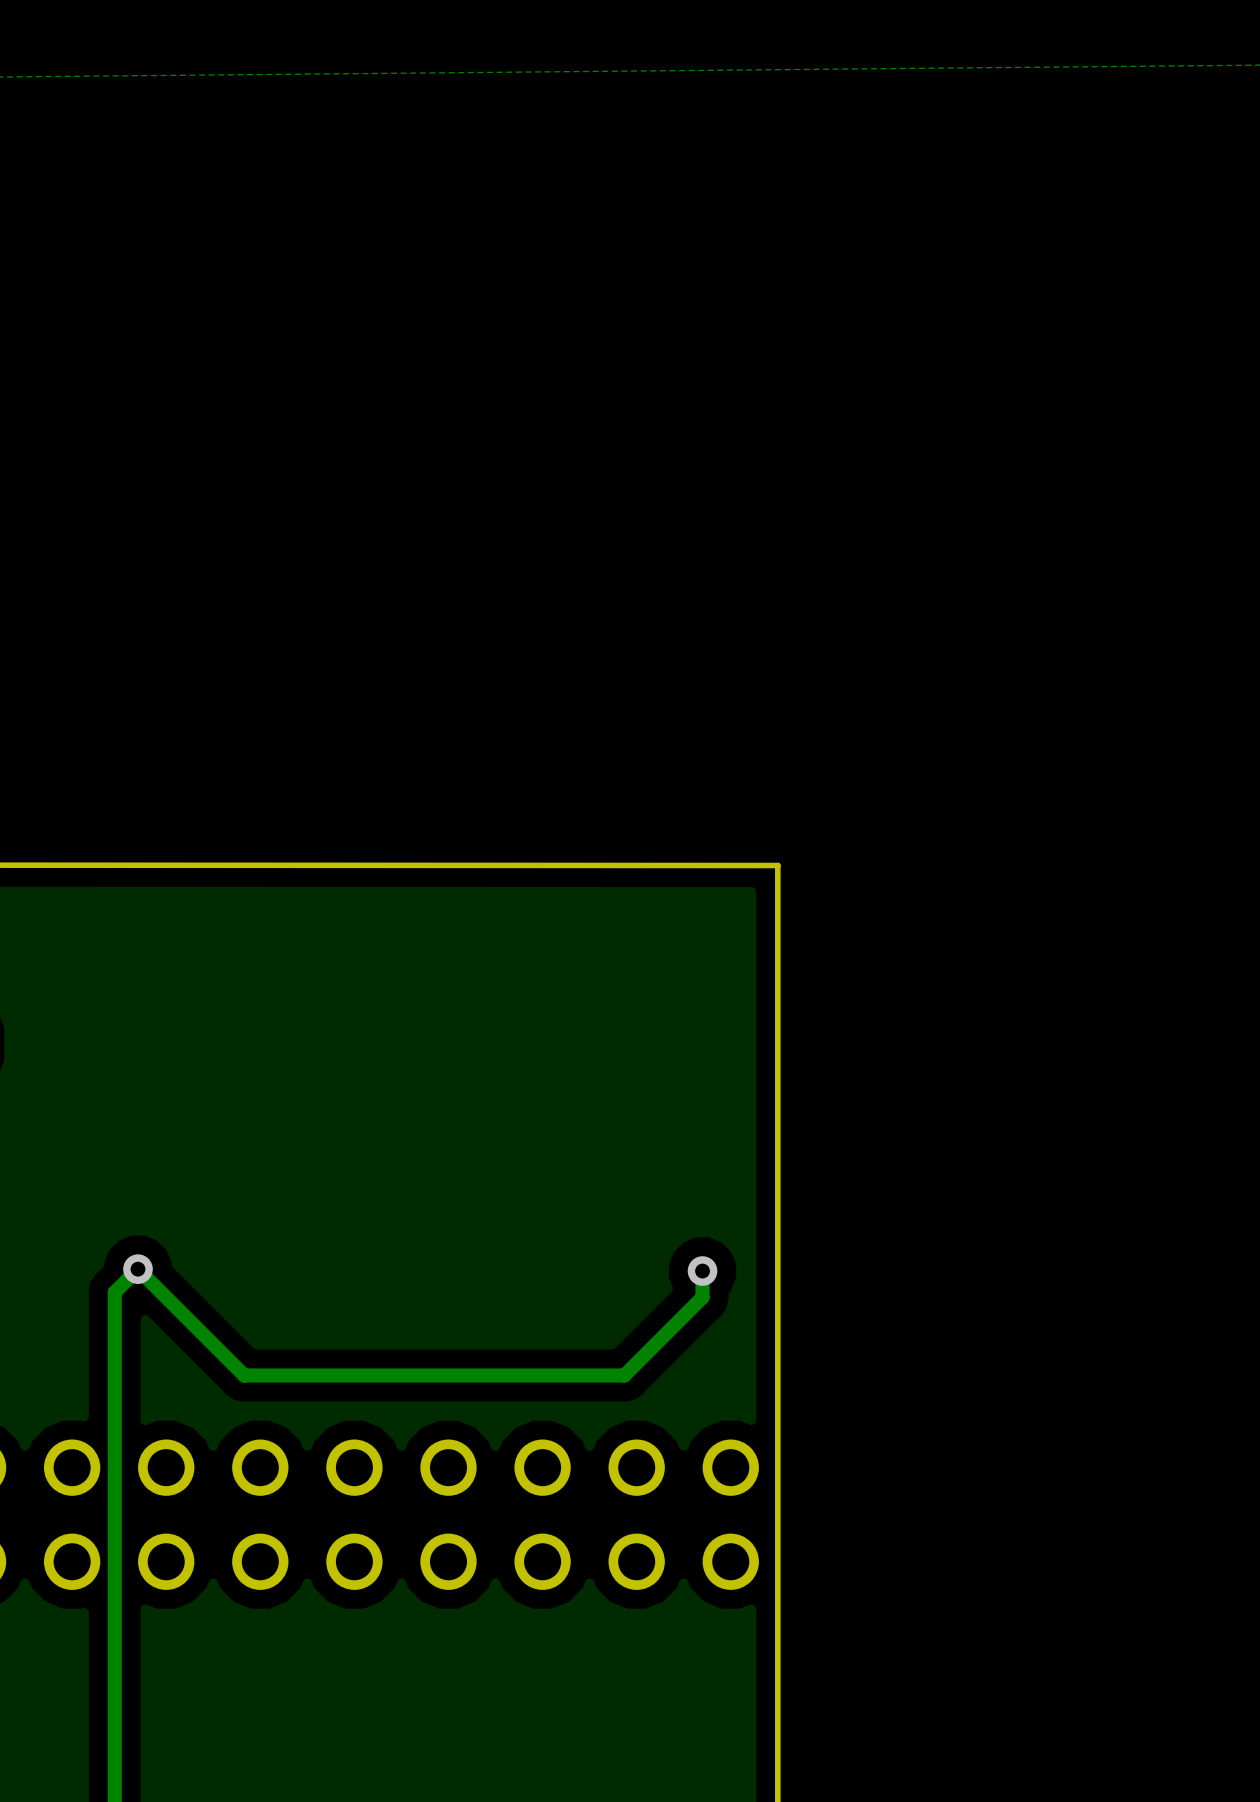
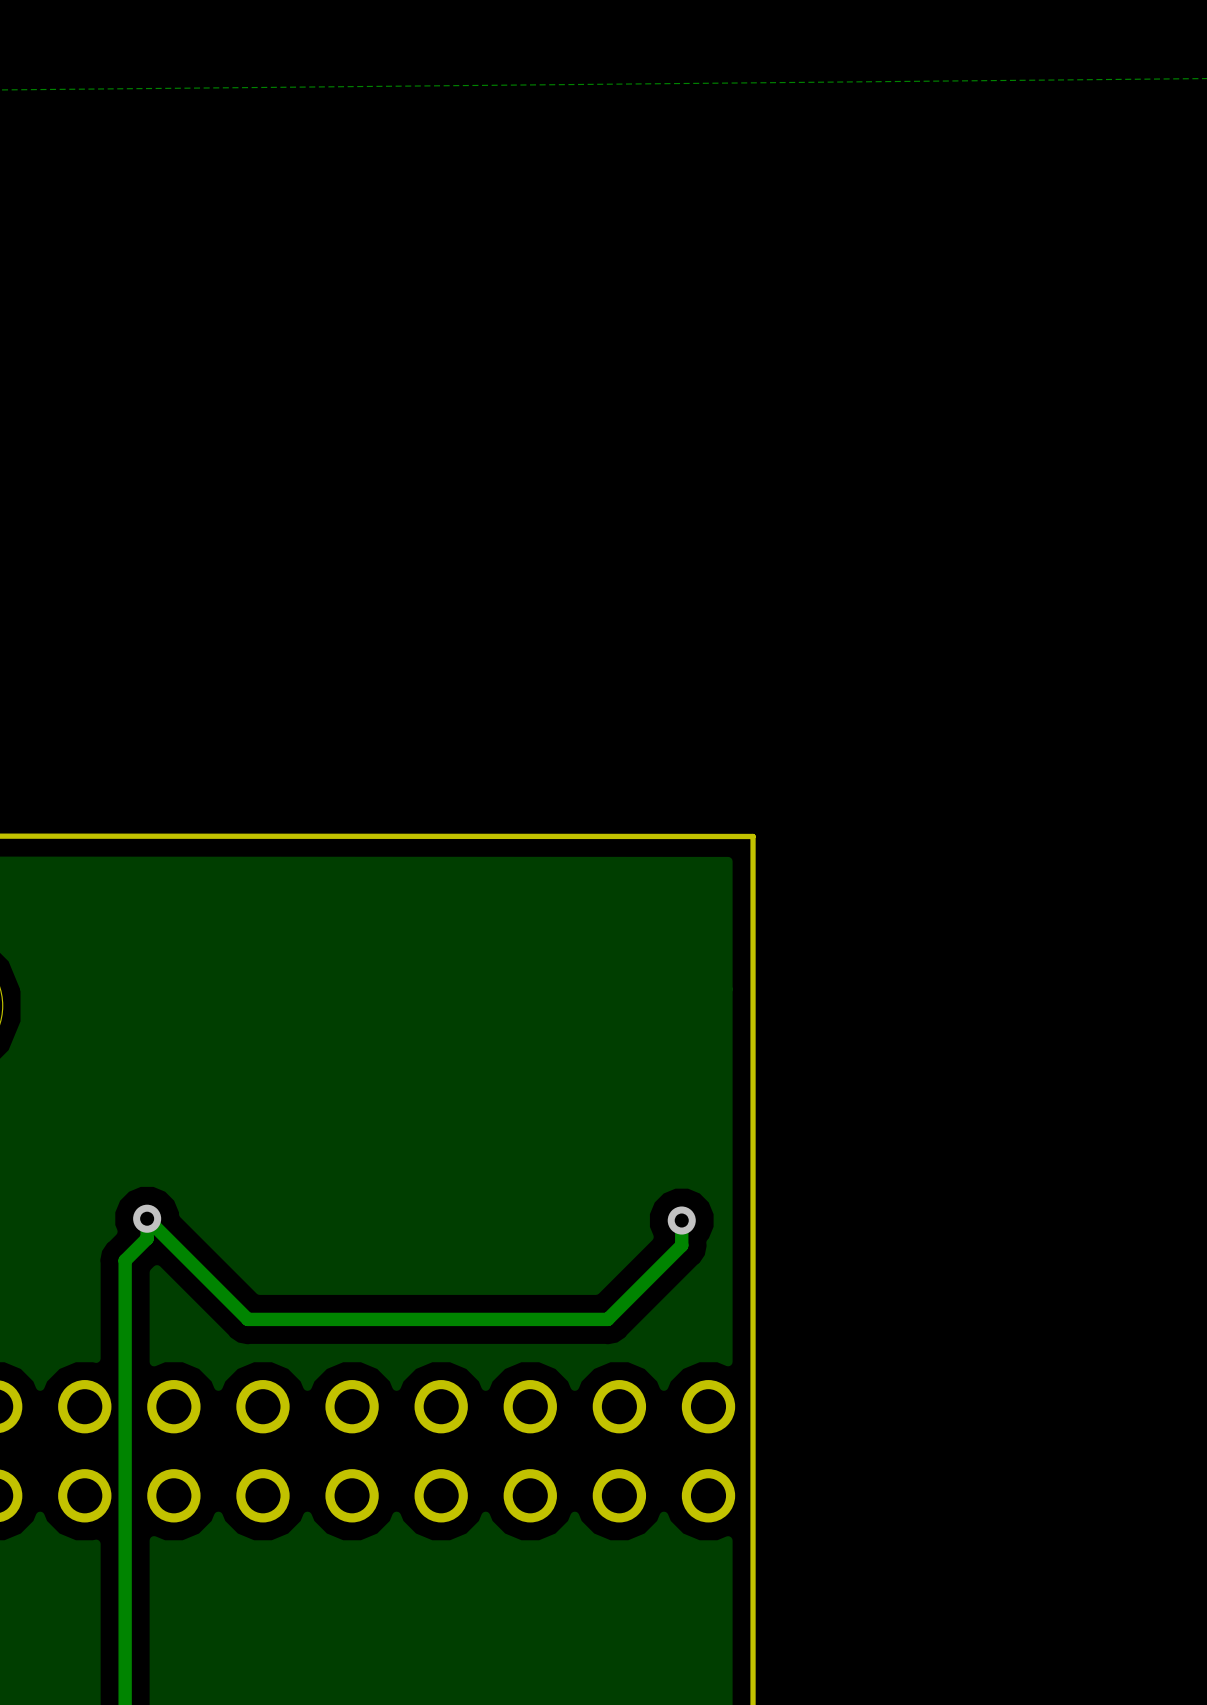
track: (137, 1269) (114, 1292) (114, 1313) -> (147, 1218) (147, 1238) (125, 1260)

